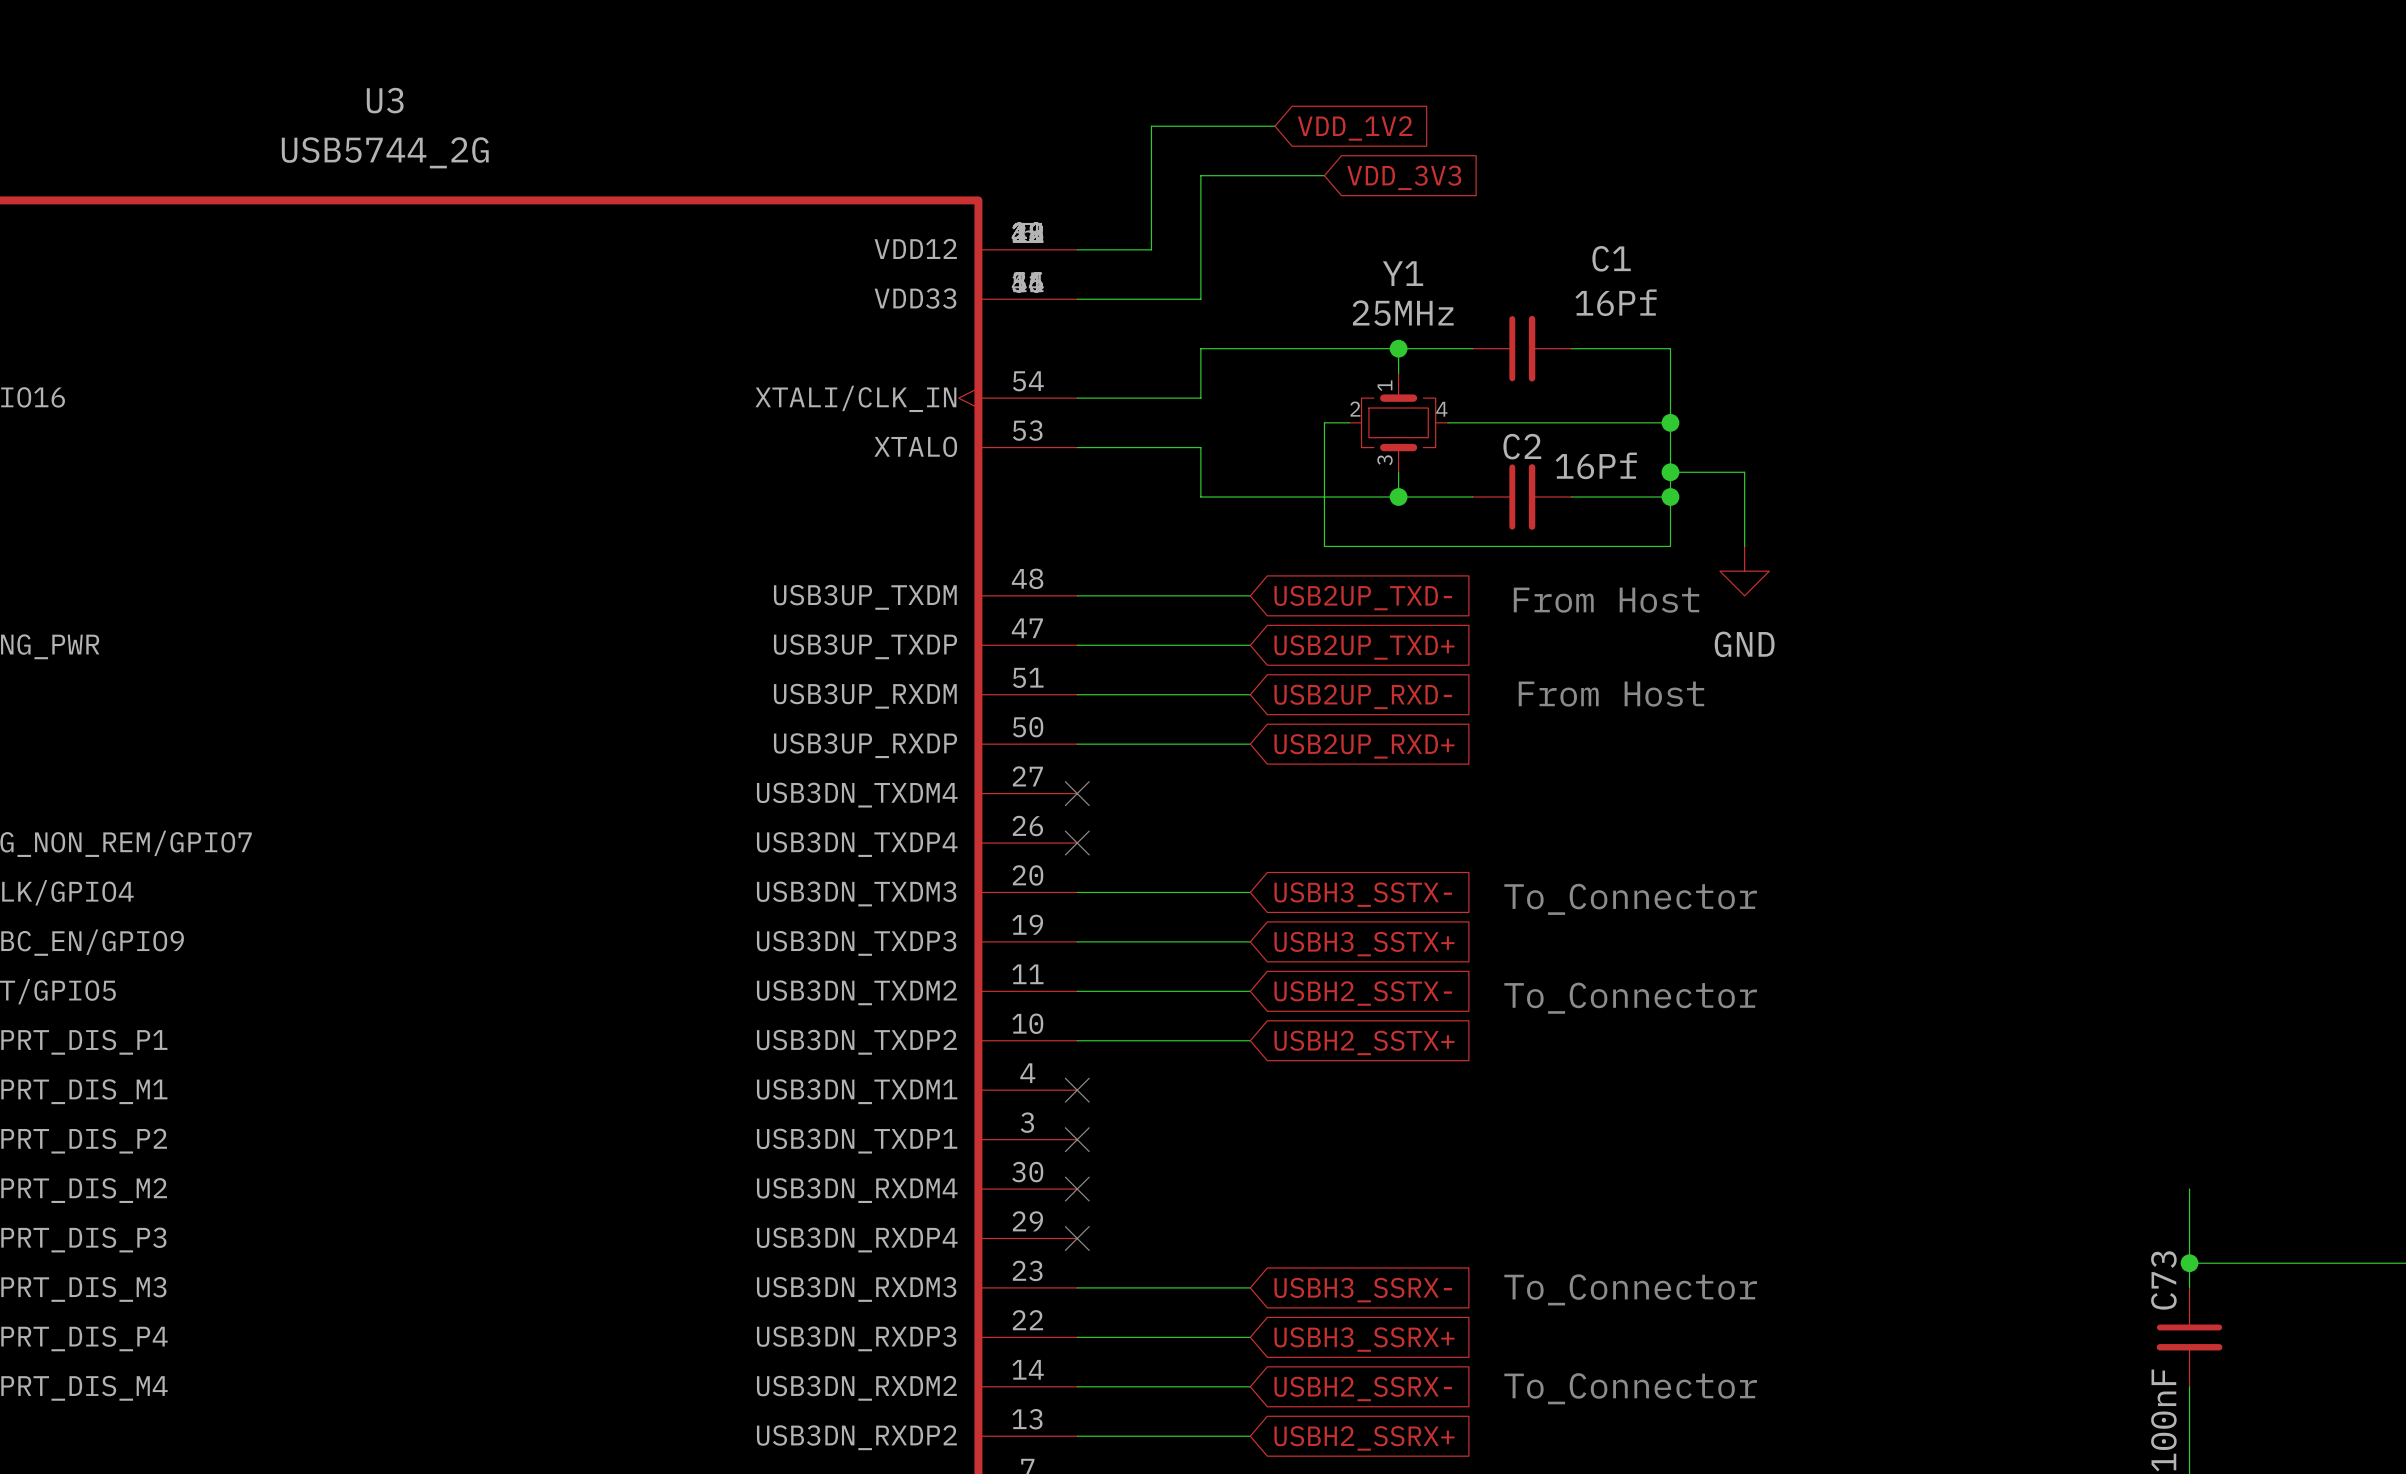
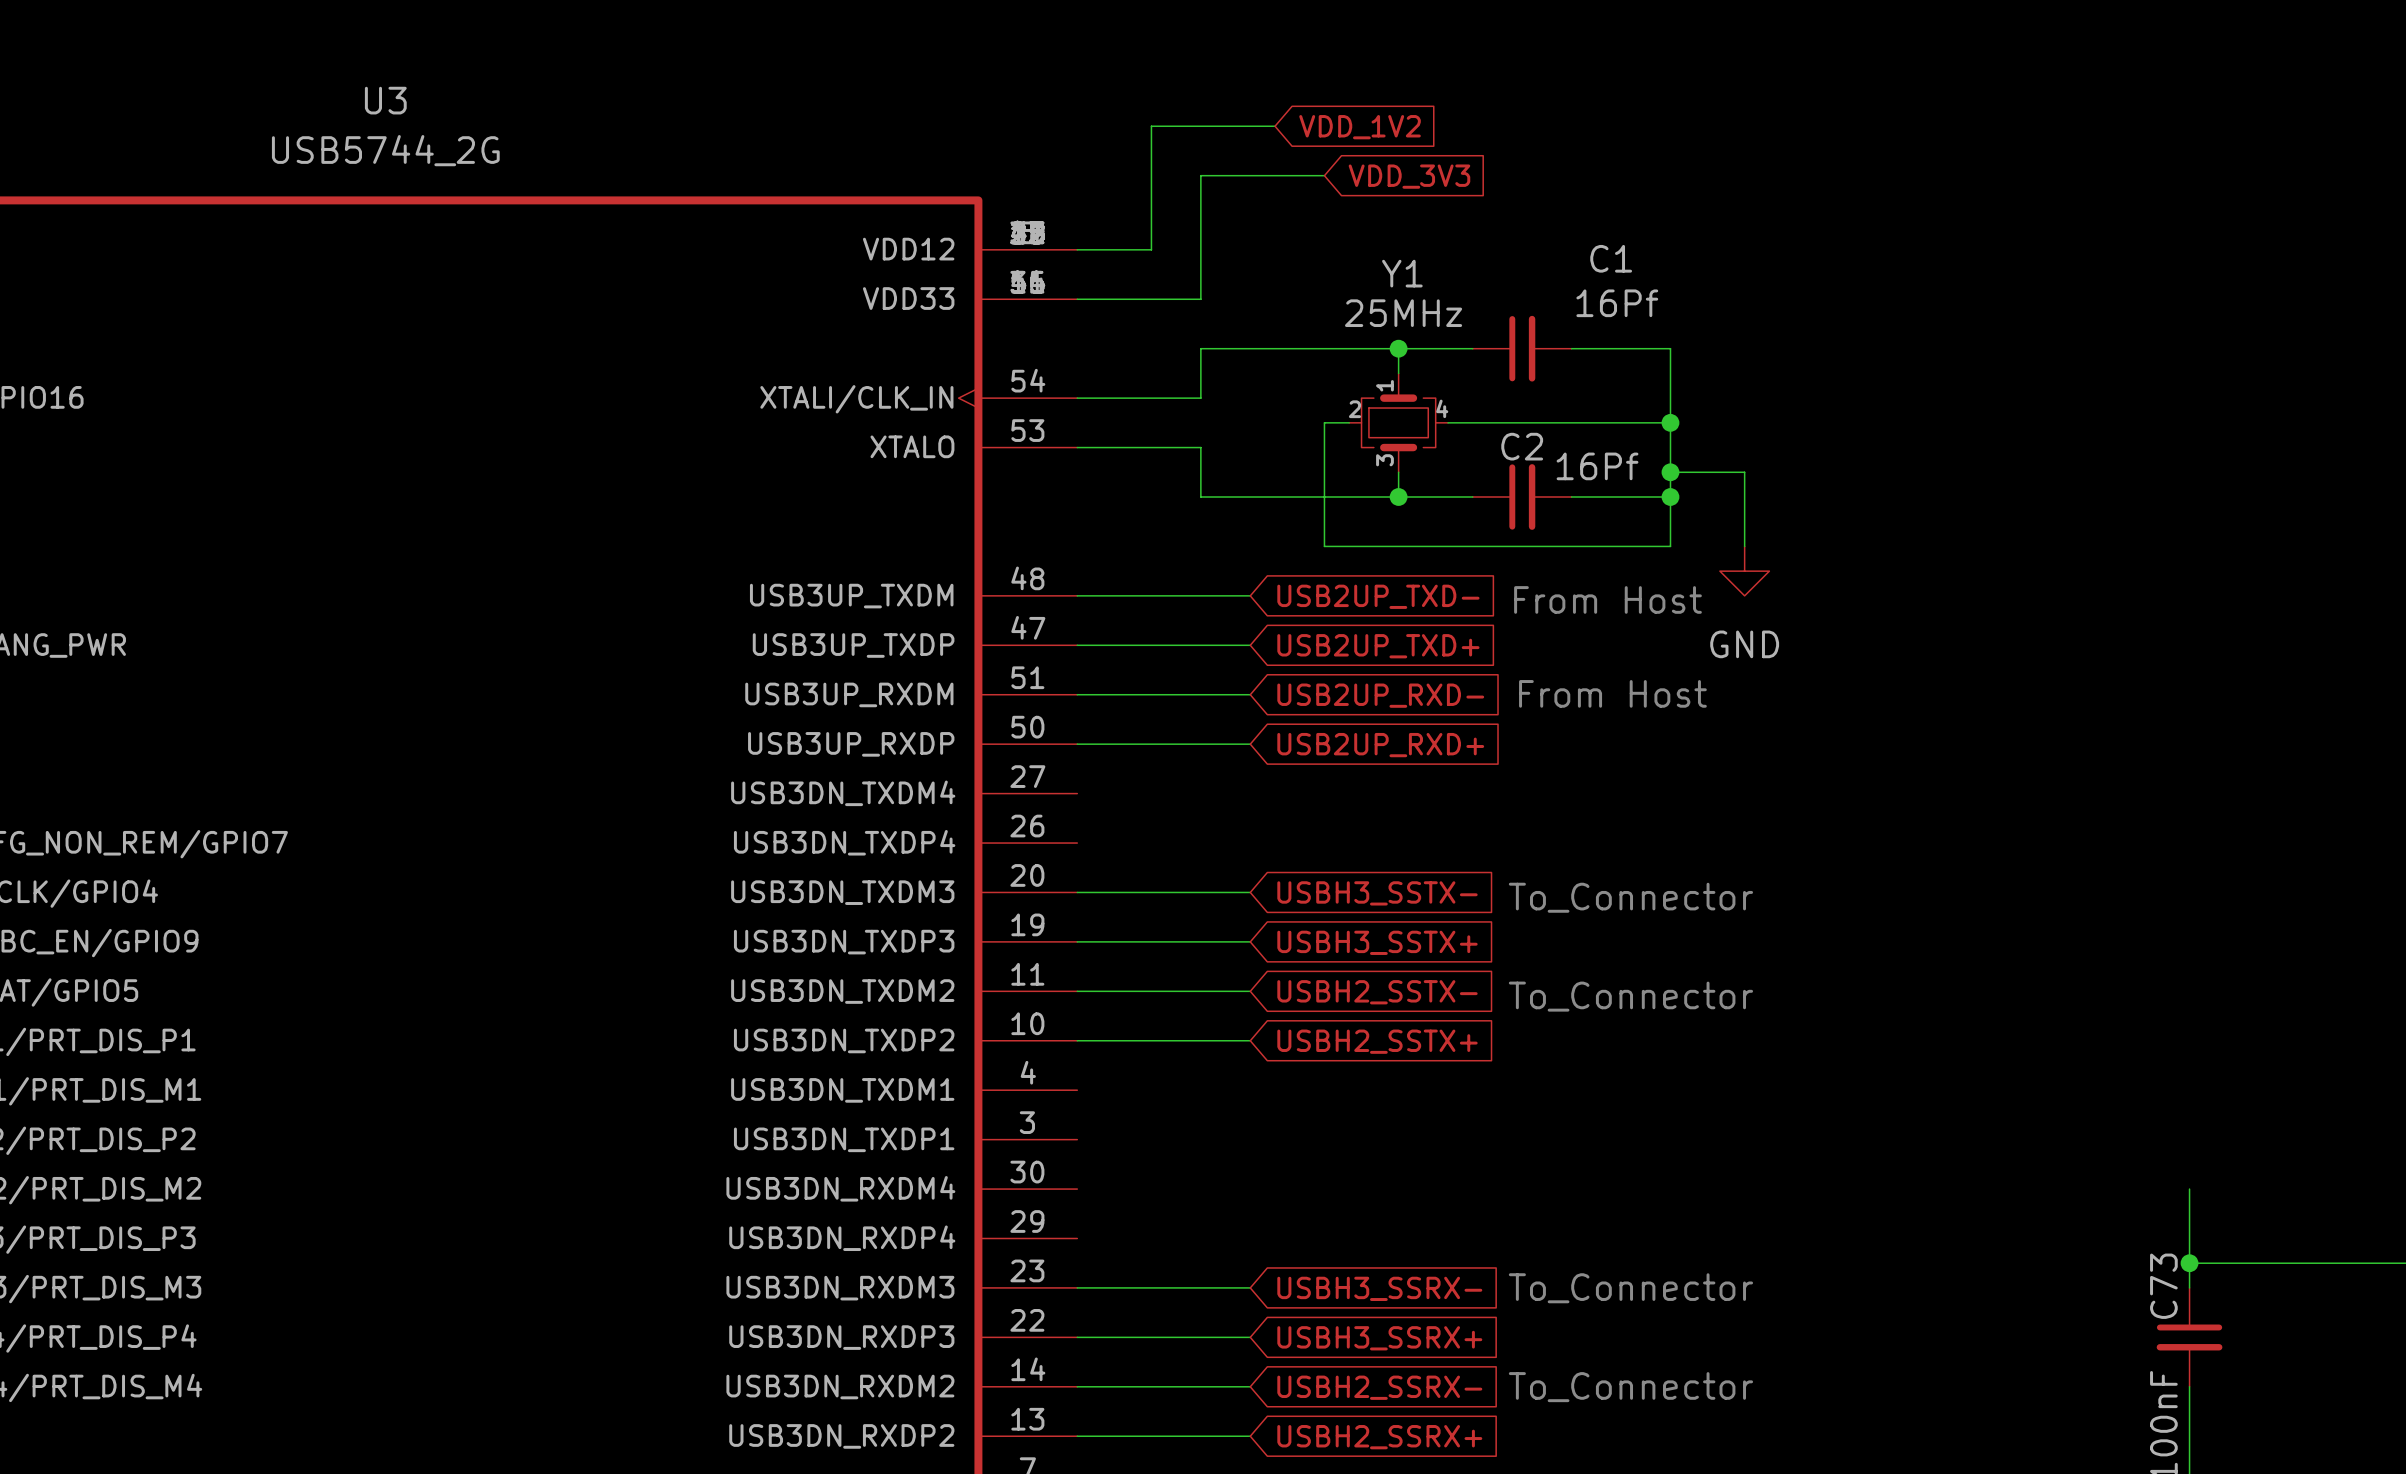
no-connect mark: (1077, 793) -> none
no-connect mark: (1077, 843) -> none
no-connect mark: (1077, 1090) -> none
no-connect mark: (1077, 1139) -> none
no-connect mark: (1077, 1189) -> none
no-connect mark: (1077, 1238) -> none

